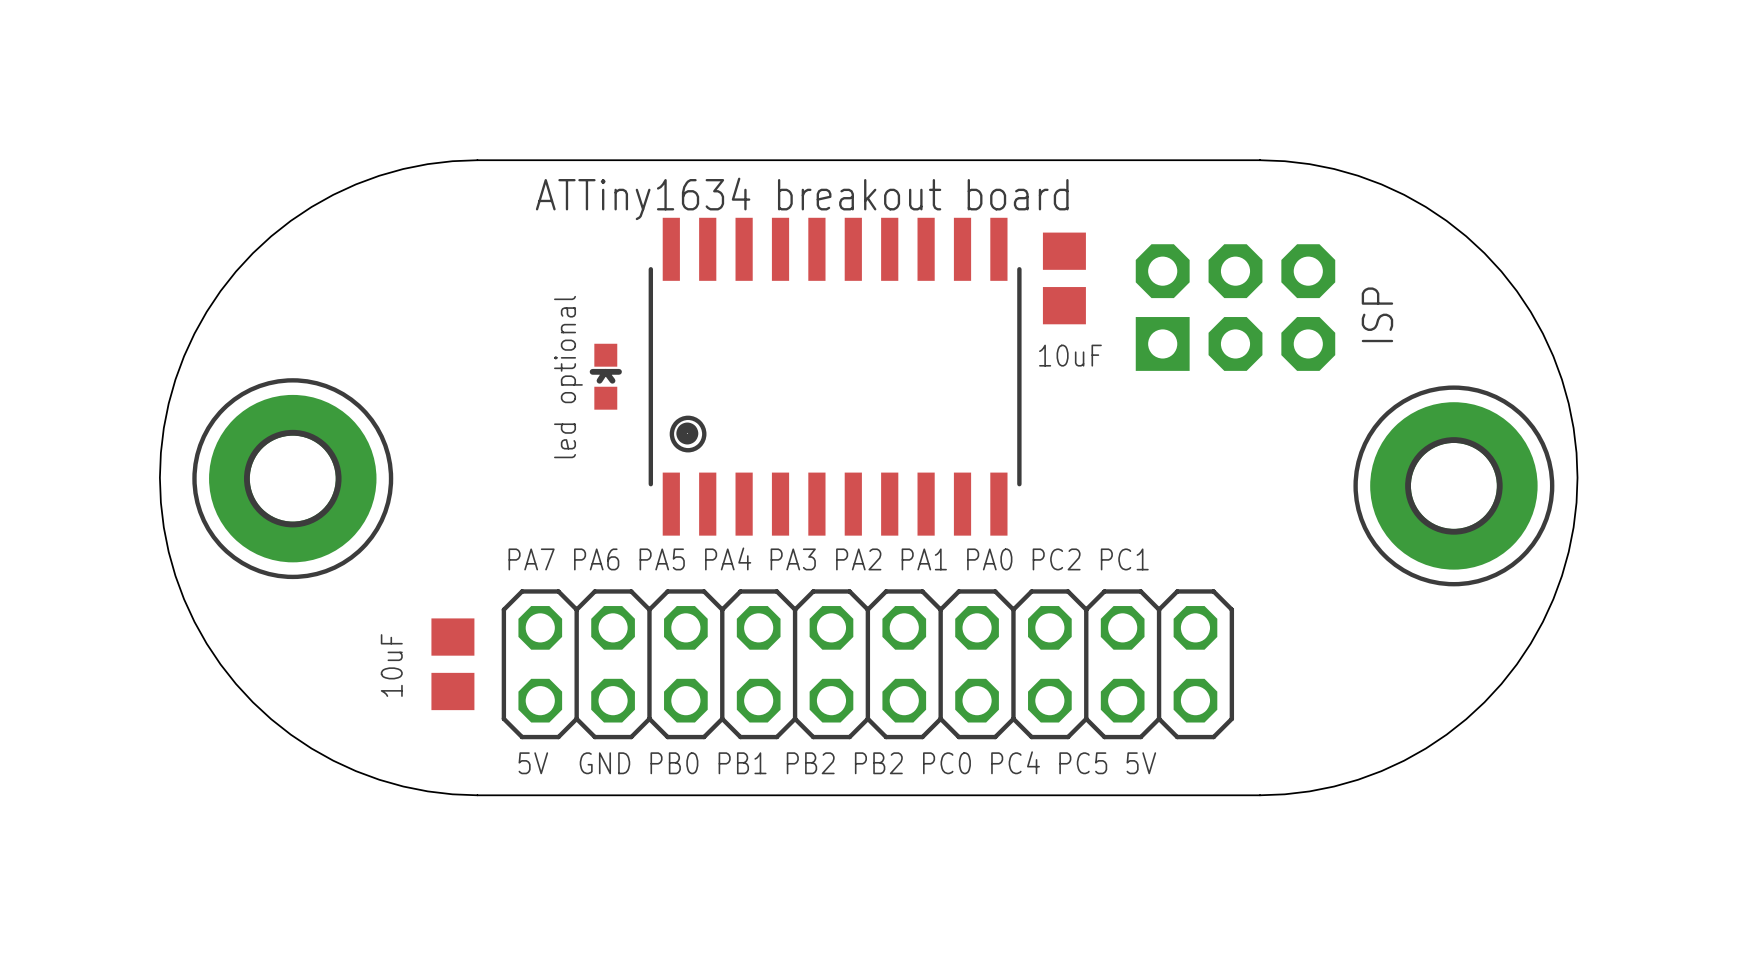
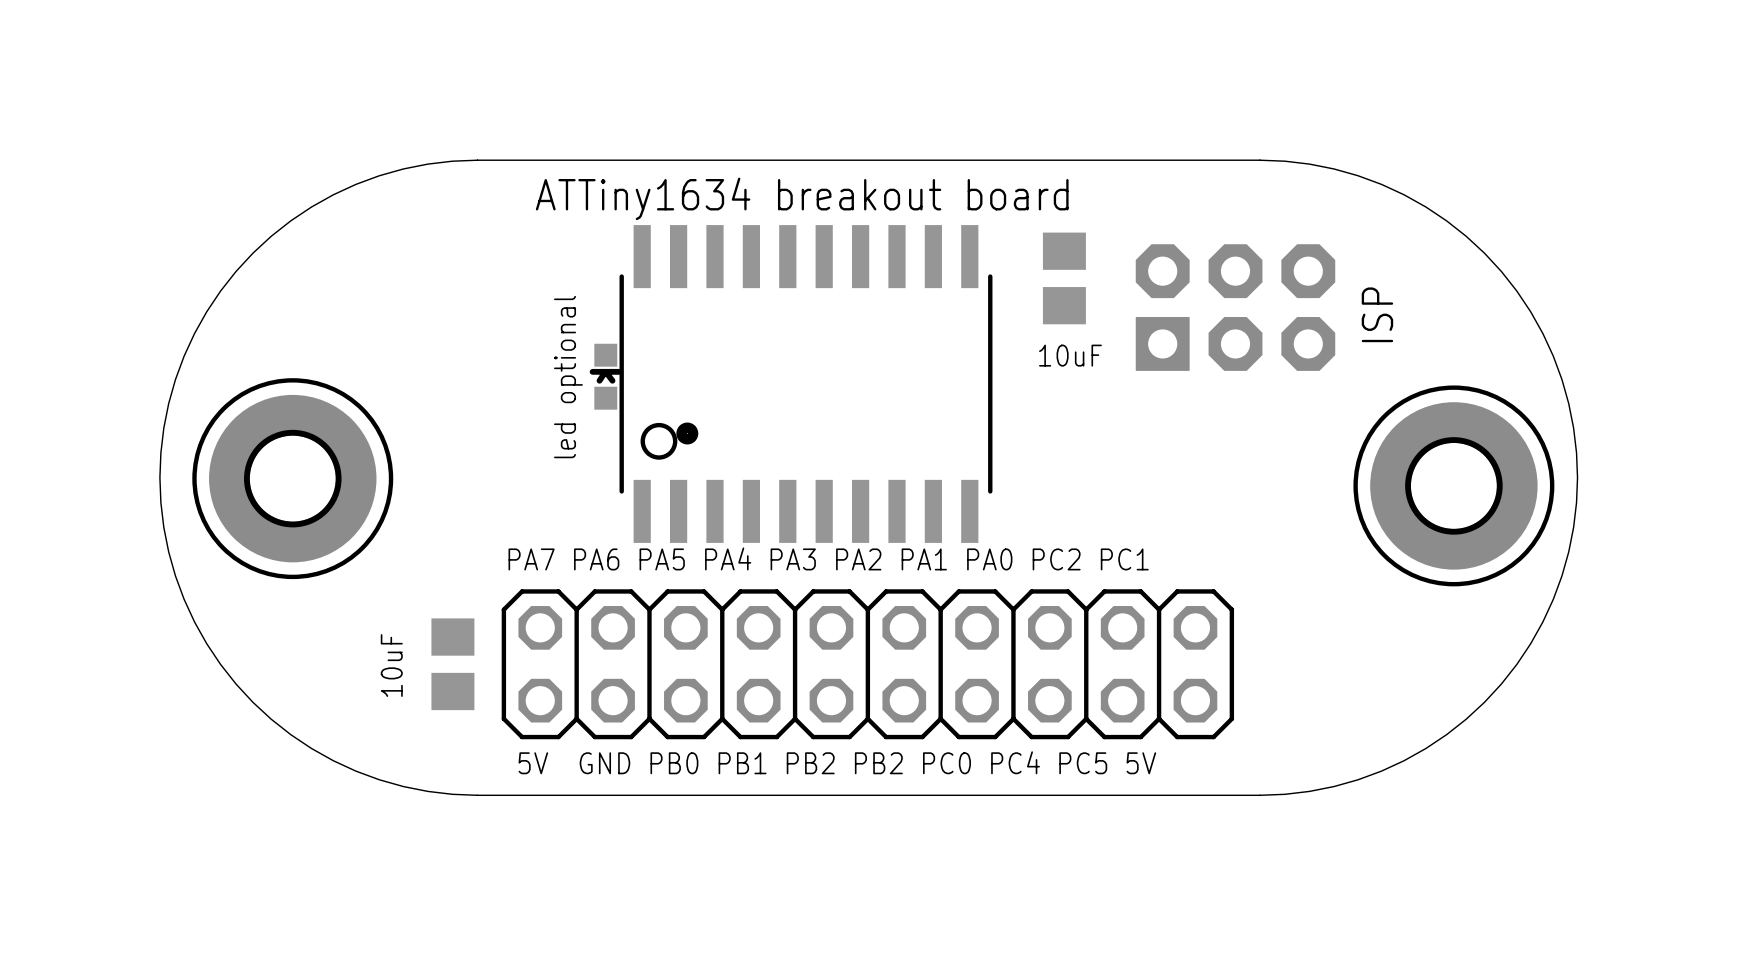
part position: (835, 376) -> (805, 383)

